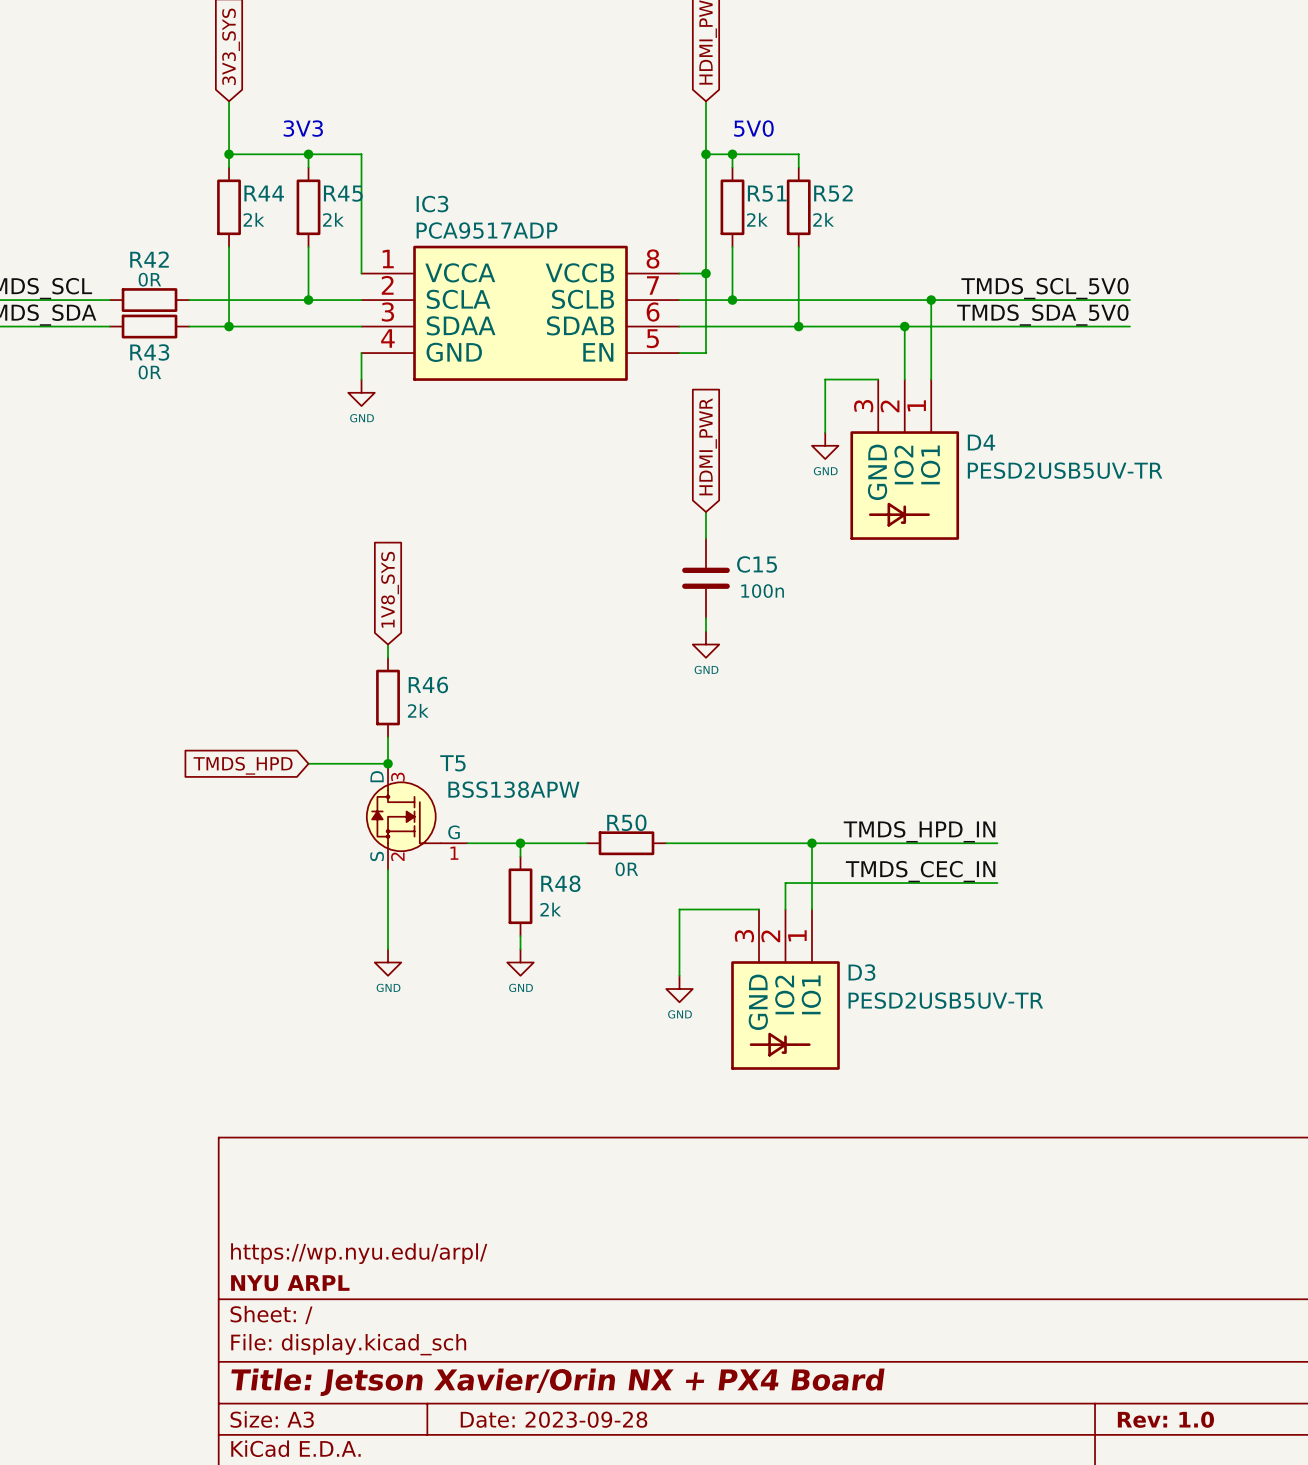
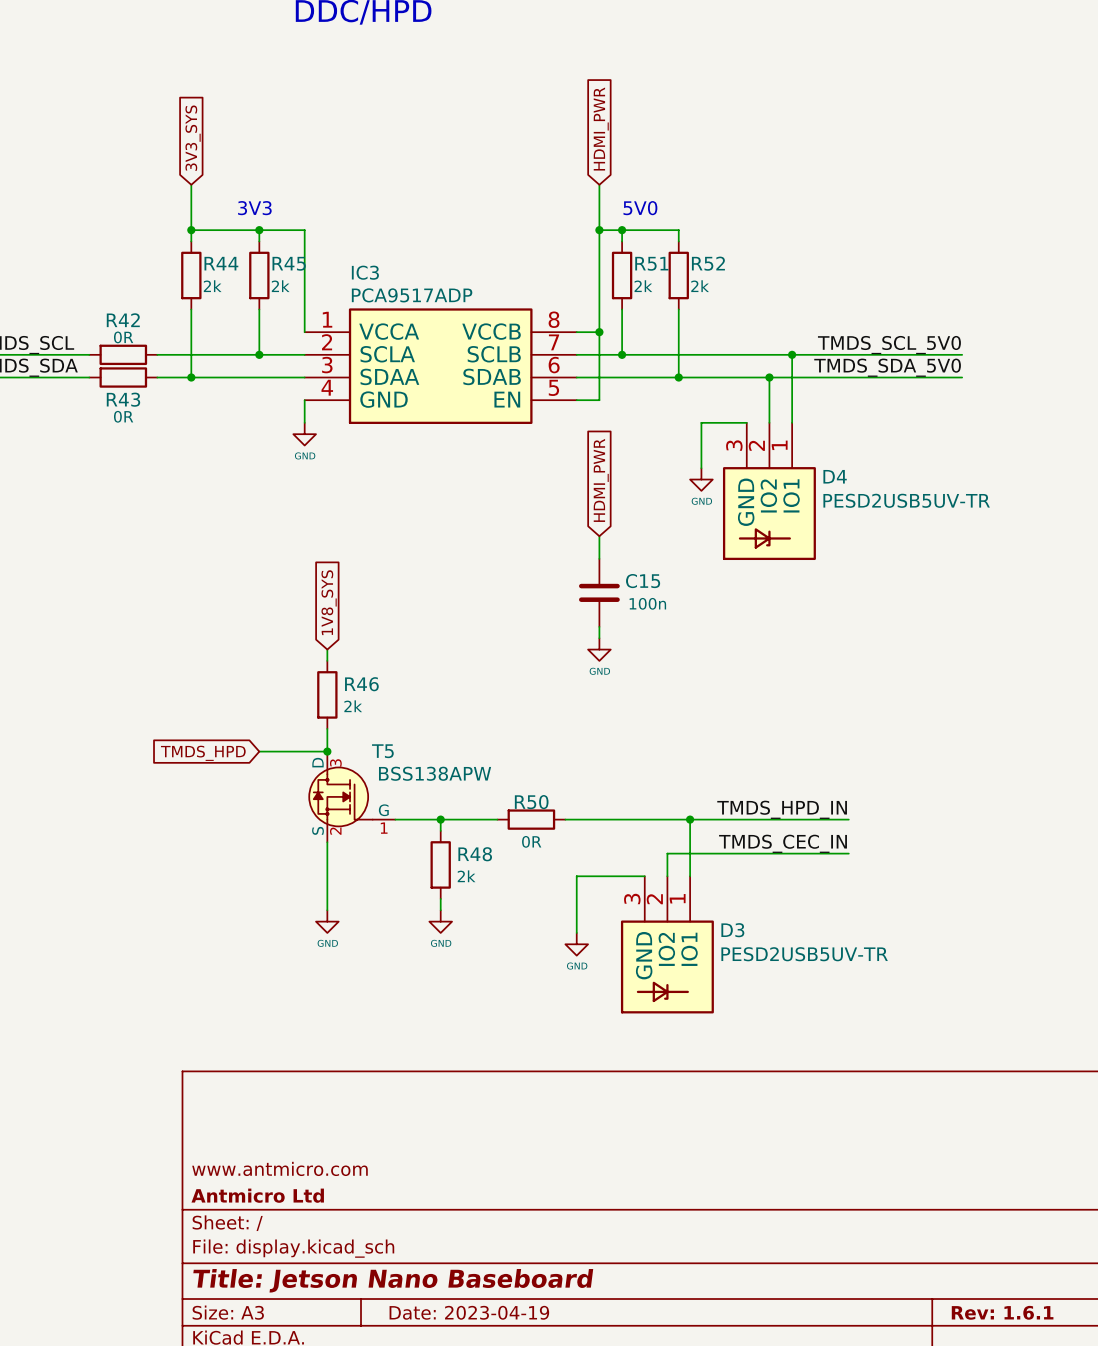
title block: https://wp.nyu.edu/arpl/ (359, 1253) -> www.antmicro.com (279, 1168)
title block: NYU ARPL (290, 1283) -> Antmicro Ltd (257, 1195)
title block: Title: Jetson Xavier/Orin NX + PX4 Board (557, 1382) -> Title: Jetson Nano Baseboard (393, 1280)
title block: Date: 2023-09-28 (554, 1419) -> Date: 2023-04-19 (469, 1312)
title block: Rev: 1.0 (1165, 1419) -> Rev: 1.6.1 (1002, 1312)

